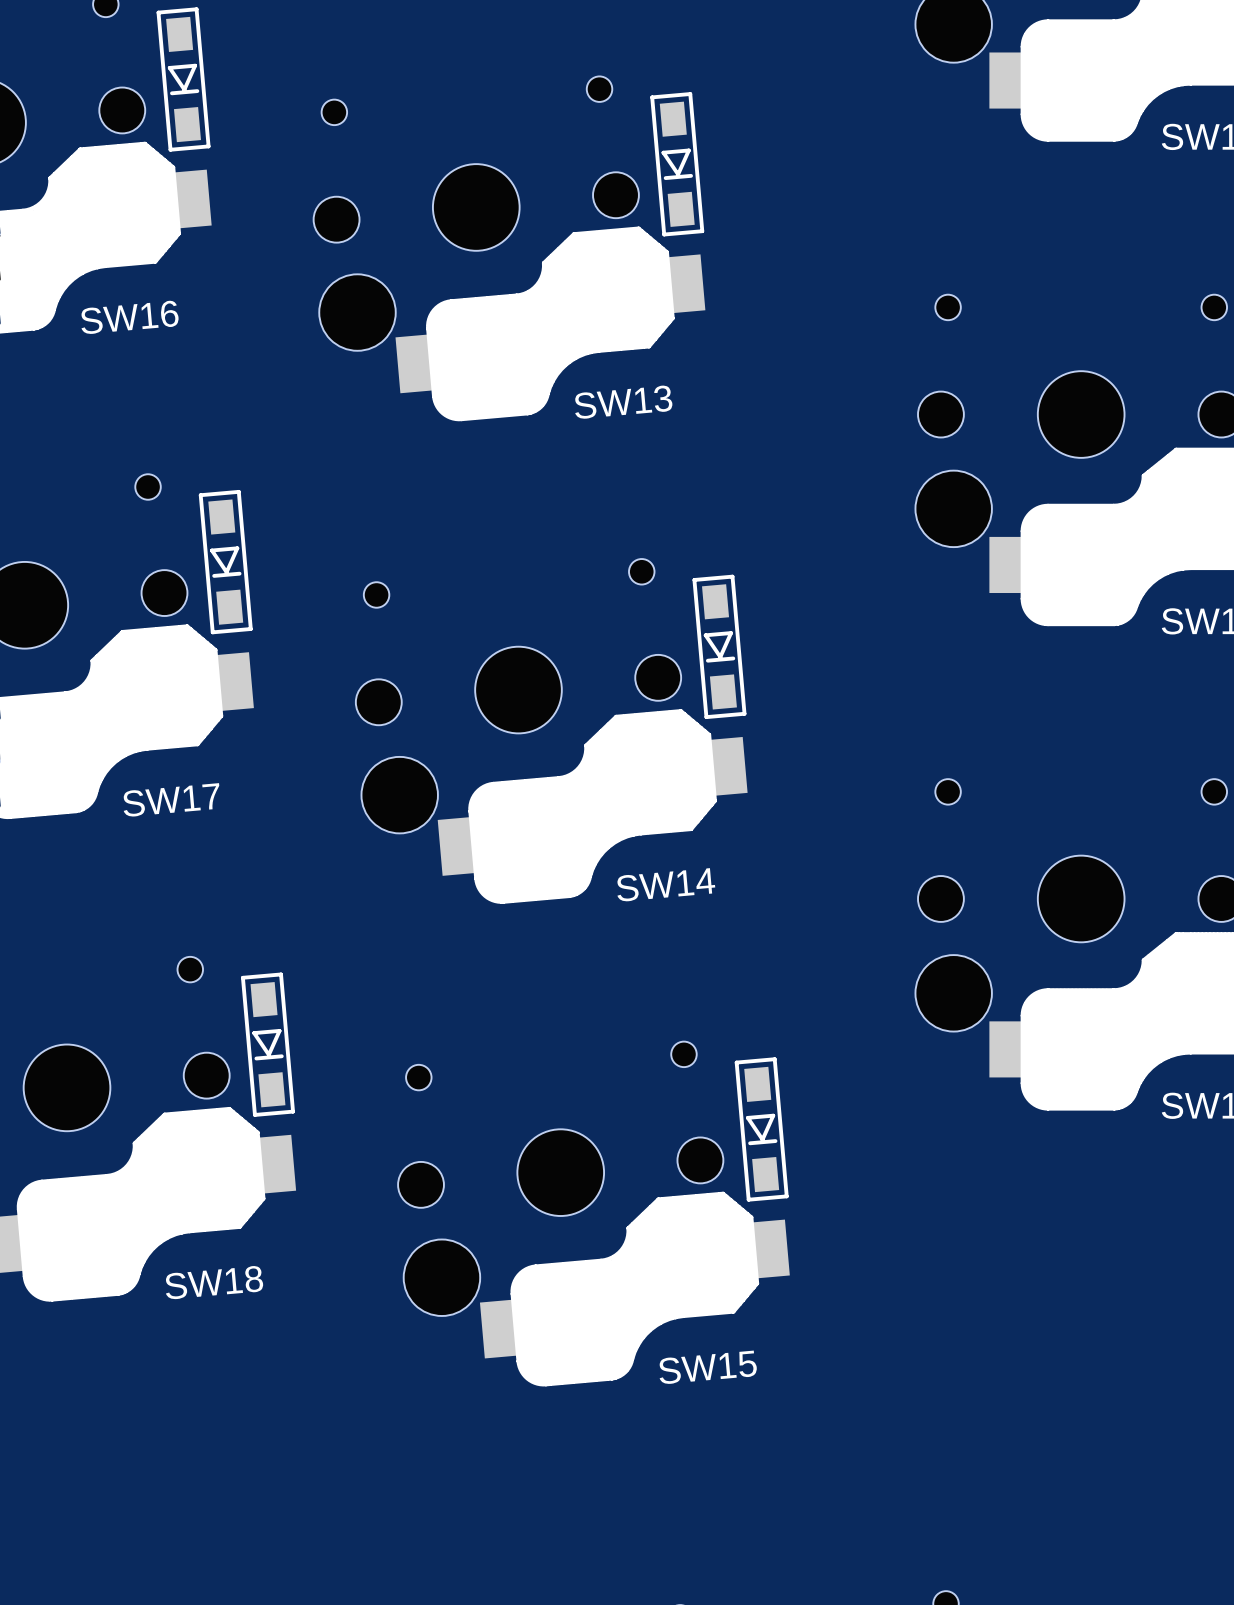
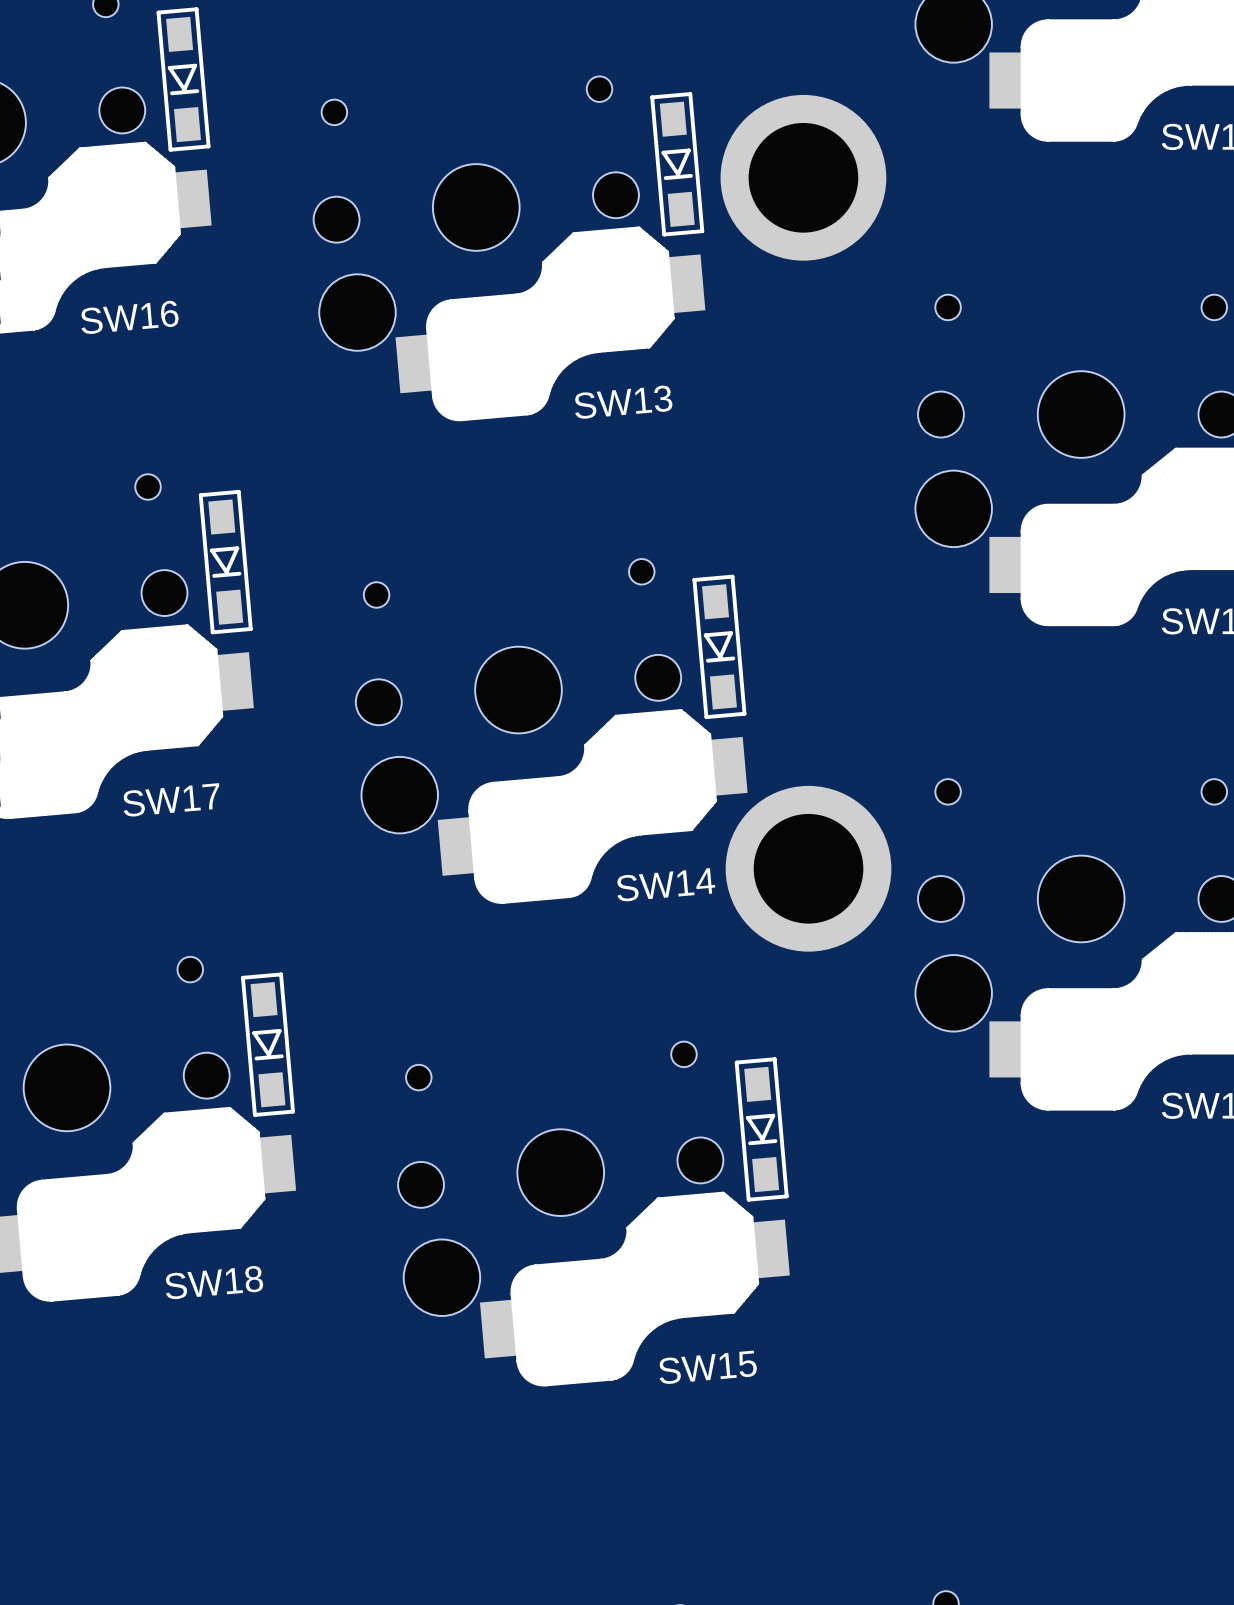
part: none -> (803, 177)
part: none -> (808, 868)

